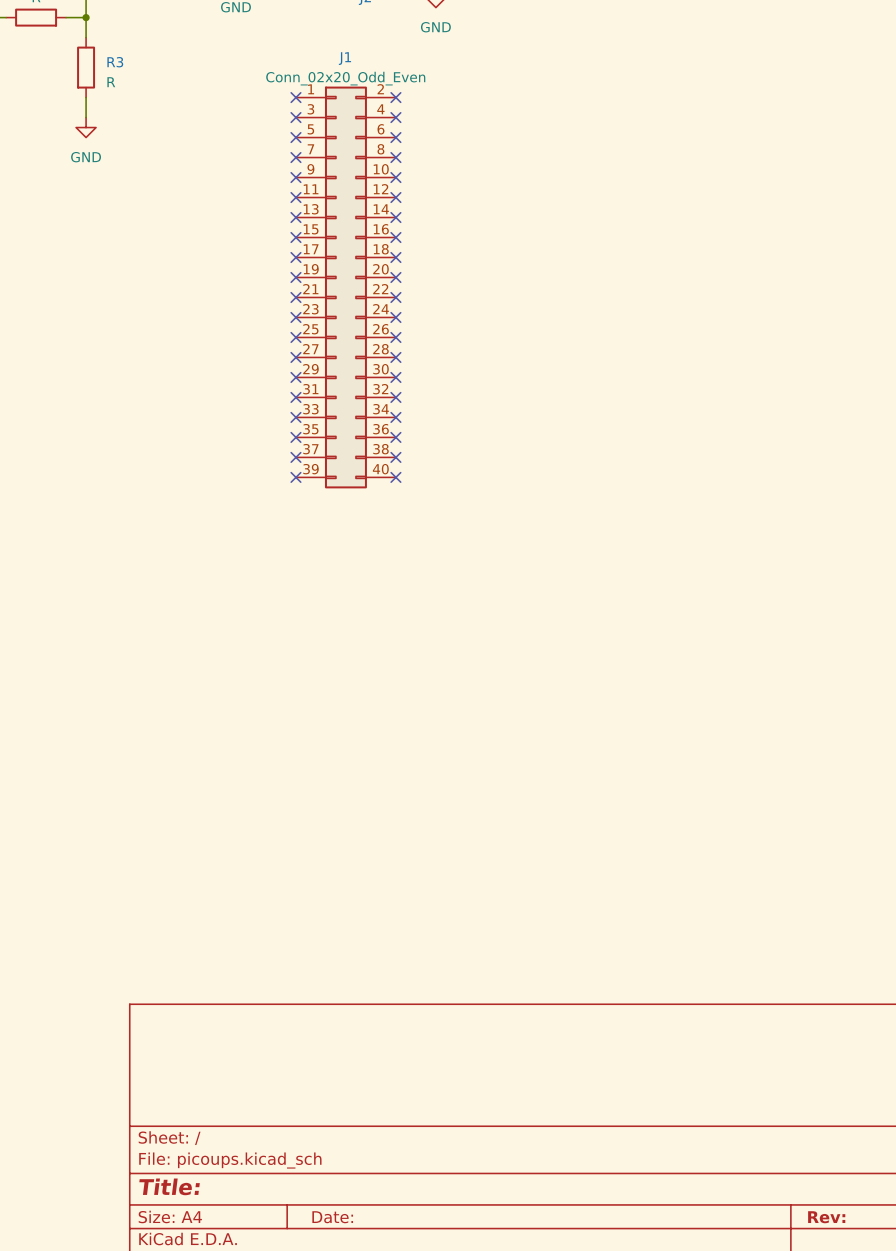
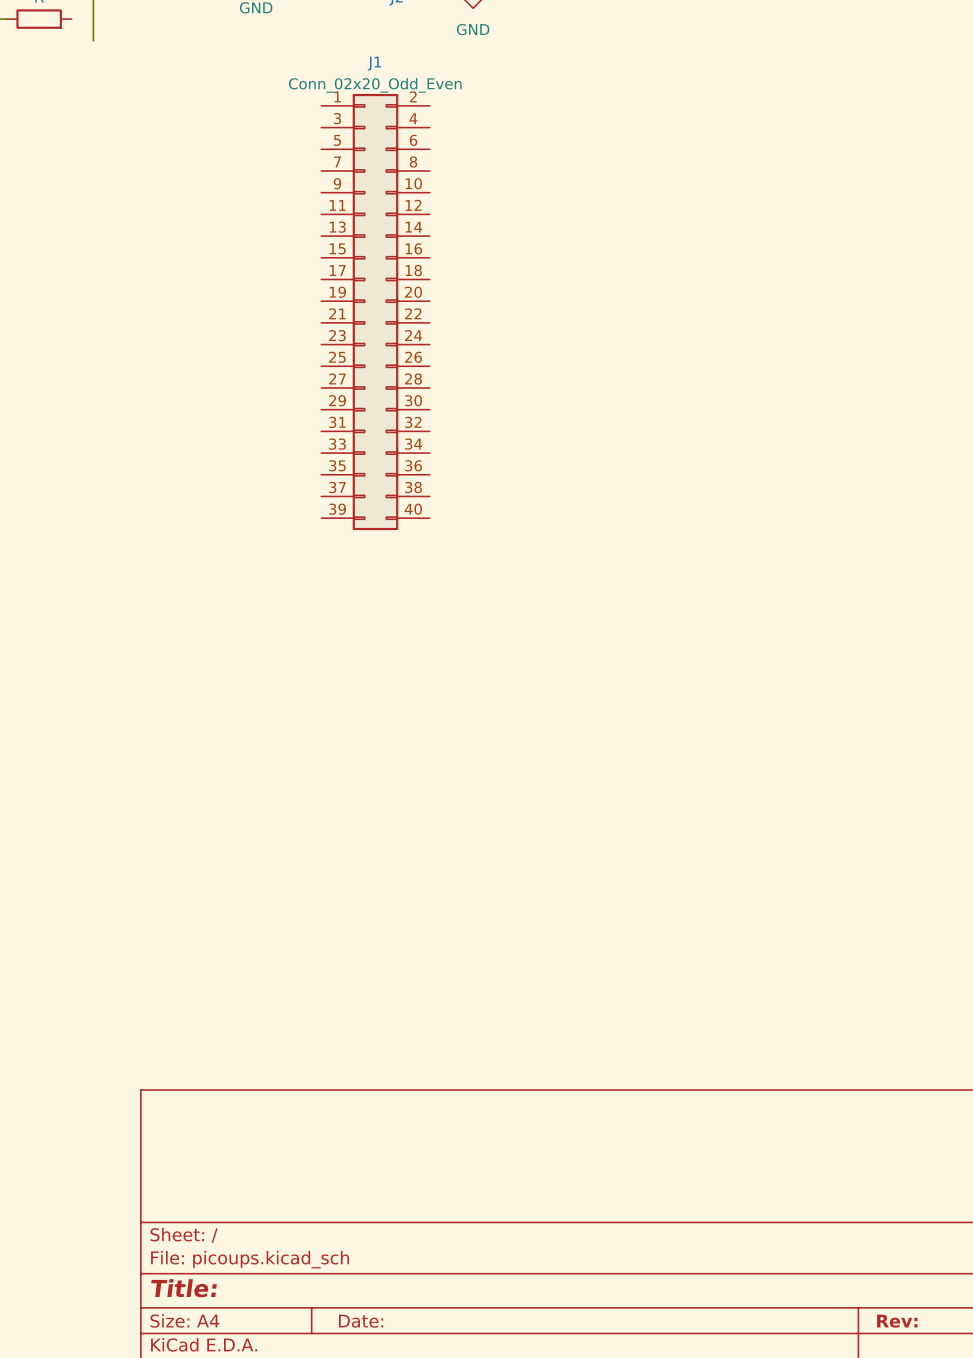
wire: (66, 17) (86, 17) -> none
junction: (86, 17) -> none
R3: R (86, 67) -> none
wire: (86, 97) (86, 117) -> none
no-connect mark: (295, 97) -> none
no-connect mark: (395, 97) -> none
no-connect mark: (295, 117) -> none
no-connect mark: (395, 117) -> none
power symbol: GND (86, 127) -> none
no-connect mark: (295, 137) -> none
no-connect mark: (395, 137) -> none
no-connect mark: (295, 157) -> none
no-connect mark: (395, 157) -> none
no-connect mark: (295, 177) -> none
no-connect mark: (395, 177) -> none
no-connect mark: (295, 197) -> none
no-connect mark: (395, 197) -> none
no-connect mark: (295, 217) -> none
no-connect mark: (395, 217) -> none
no-connect mark: (295, 237) -> none
no-connect mark: (395, 237) -> none
no-connect mark: (295, 257) -> none
no-connect mark: (395, 257) -> none
no-connect mark: (295, 277) -> none
no-connect mark: (395, 277) -> none
no-connect mark: (295, 297) -> none
no-connect mark: (395, 297) -> none
no-connect mark: (295, 317) -> none
no-connect mark: (395, 317) -> none
no-connect mark: (295, 337) -> none
no-connect mark: (395, 337) -> none
no-connect mark: (295, 357) -> none
no-connect mark: (395, 357) -> none
no-connect mark: (295, 377) -> none
no-connect mark: (395, 377) -> none
no-connect mark: (295, 397) -> none
no-connect mark: (395, 397) -> none
no-connect mark: (295, 417) -> none
no-connect mark: (395, 417) -> none
no-connect mark: (295, 437) -> none
no-connect mark: (395, 437) -> none
no-connect mark: (295, 457) -> none
no-connect mark: (395, 457) -> none
no-connect mark: (295, 477) -> none
no-connect mark: (395, 477) -> none

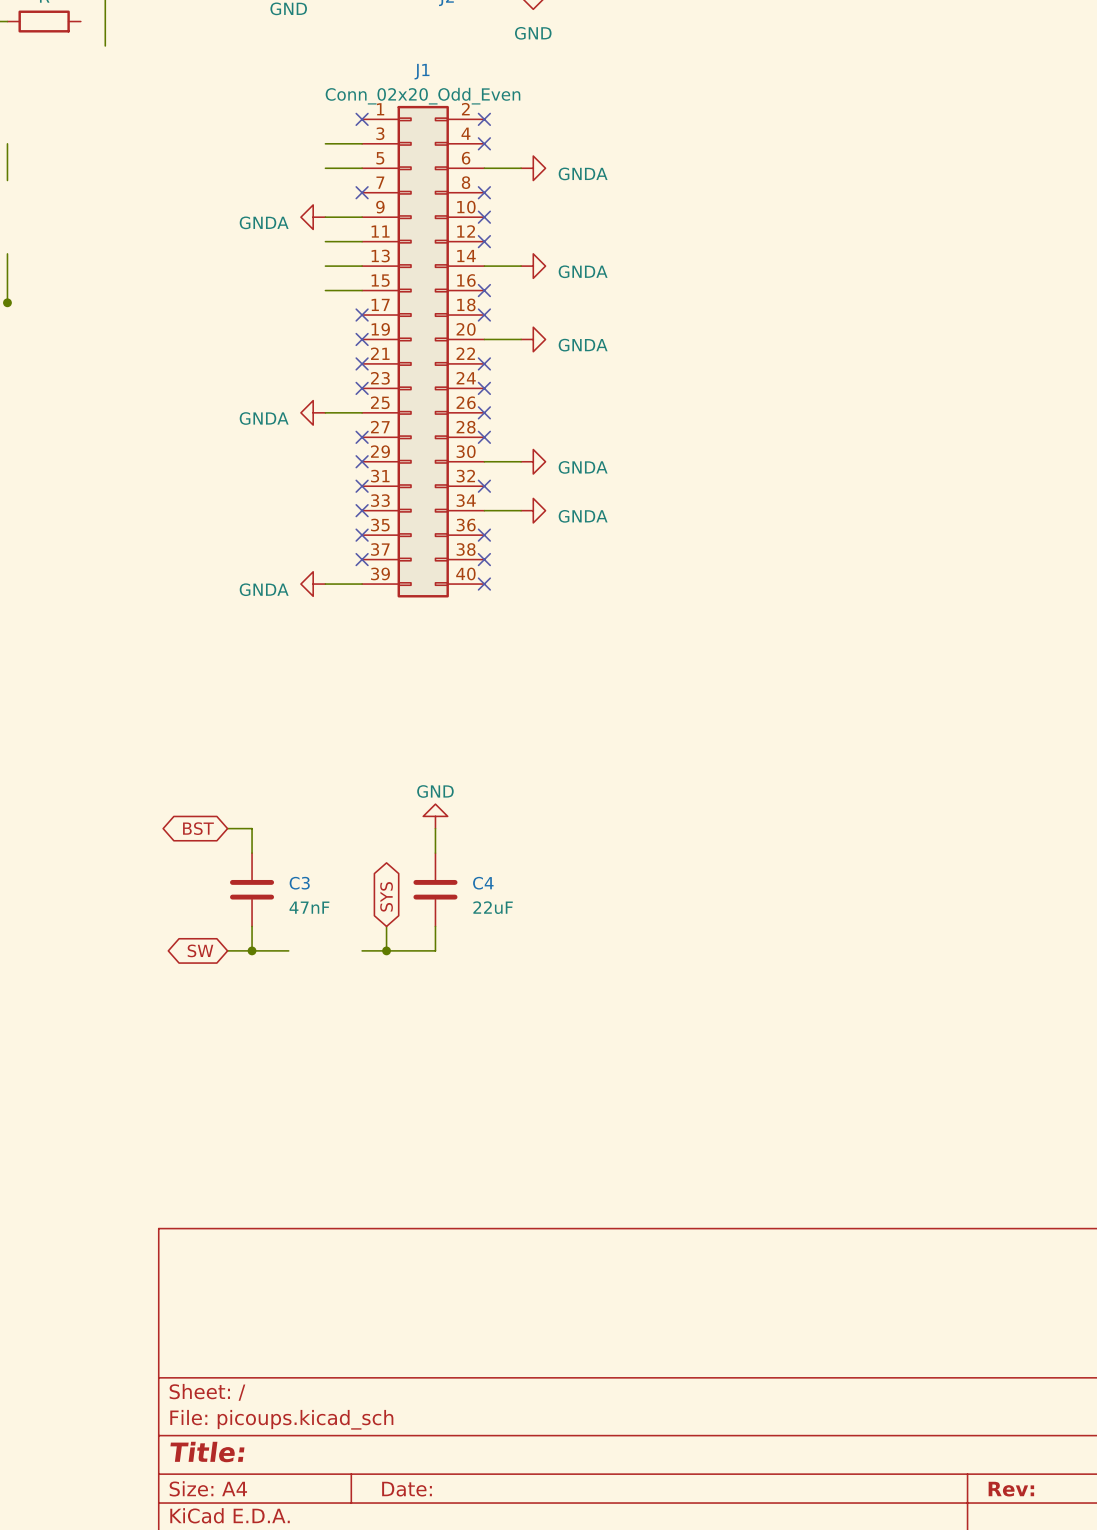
no-connect mark: none -> (362, 119)
no-connect mark: none -> (484, 119)
wire: none -> (7, 143) (7, 180)
wire: none -> (325, 143) (362, 143)
no-connect mark: none -> (484, 143)
wire: none -> (325, 168) (362, 168)
wire: none -> (484, 168) (521, 168)
power symbol: none -> GNDA (533, 168)
no-connect mark: none -> (362, 192)
no-connect mark: none -> (484, 192)
power symbol: none -> GNDA (313, 217)
wire: none -> (325, 217) (362, 217)
no-connect mark: none -> (484, 217)
wire: none -> (325, 241) (362, 241)
no-connect mark: none -> (484, 241)
wire: none -> (7, 253) (7, 302)
wire: none -> (325, 266) (362, 266)
wire: none -> (484, 266) (521, 266)
power symbol: none -> GNDA (533, 266)
wire: none -> (325, 290) (362, 290)
no-connect mark: none -> (484, 290)
junction: none -> (7, 302)
no-connect mark: none -> (362, 315)
no-connect mark: none -> (484, 315)
no-connect mark: none -> (362, 339)
wire: none -> (484, 339) (521, 339)
power symbol: none -> GNDA (533, 339)
no-connect mark: none -> (362, 363)
no-connect mark: none -> (484, 363)
no-connect mark: none -> (362, 388)
no-connect mark: none -> (484, 388)
power symbol: none -> GNDA (313, 412)
wire: none -> (325, 412) (362, 412)
no-connect mark: none -> (484, 412)
no-connect mark: none -> (362, 437)
no-connect mark: none -> (484, 437)
no-connect mark: none -> (362, 461)
wire: none -> (484, 461) (521, 461)
power symbol: none -> GNDA (533, 461)
no-connect mark: none -> (362, 486)
no-connect mark: none -> (484, 486)
no-connect mark: none -> (362, 510)
wire: none -> (484, 510) (521, 510)
power symbol: none -> GNDA (533, 510)
no-connect mark: none -> (362, 535)
no-connect mark: none -> (484, 535)
no-connect mark: none -> (362, 559)
no-connect mark: none -> (484, 559)
power symbol: none -> GNDA (313, 584)
wire: none -> (325, 584) (362, 584)
no-connect mark: none -> (484, 584)
power symbol: none -> GND (435, 816)
global label: none -> BST (198, 828)
wire: none -> (227, 828) (252, 828) (252, 853)
wire: none -> (435, 828) (435, 853)
C3: none -> 47nF (252, 889)
C4: none -> 22uF (435, 889)
global label: none -> SYS (386, 896)
wire: none -> (252, 926) (252, 950)
wire: none -> (386, 926) (386, 950)
wire: none -> (435, 926) (435, 950) (362, 950)
global label: none -> SW (200, 950)
wire: none -> (227, 950) (288, 950)
junction: none -> (252, 950)
junction: none -> (386, 950)

